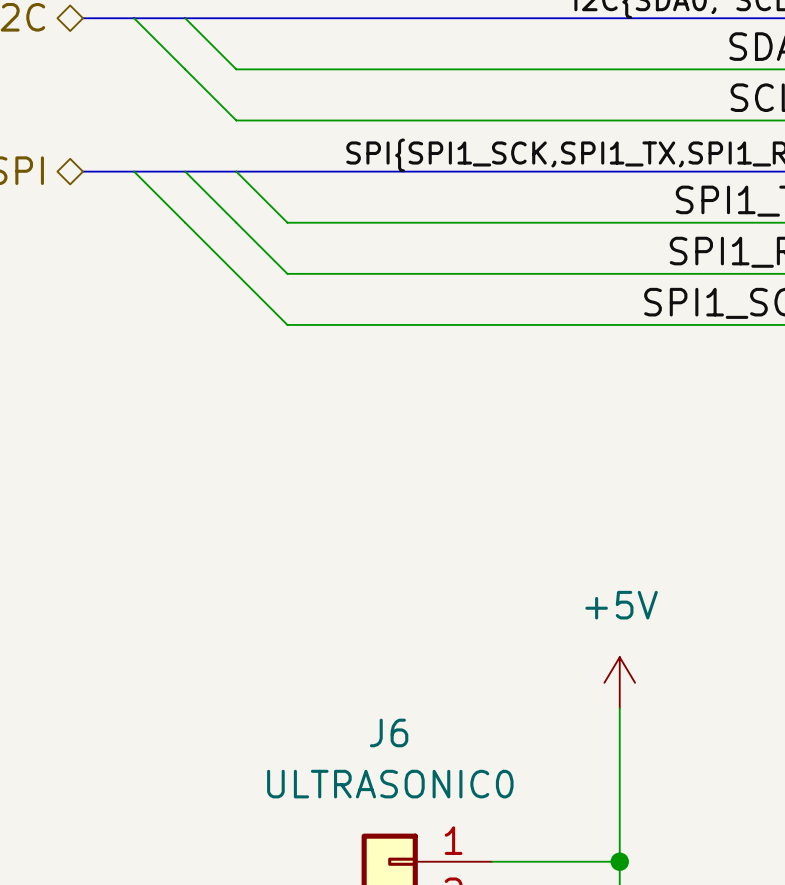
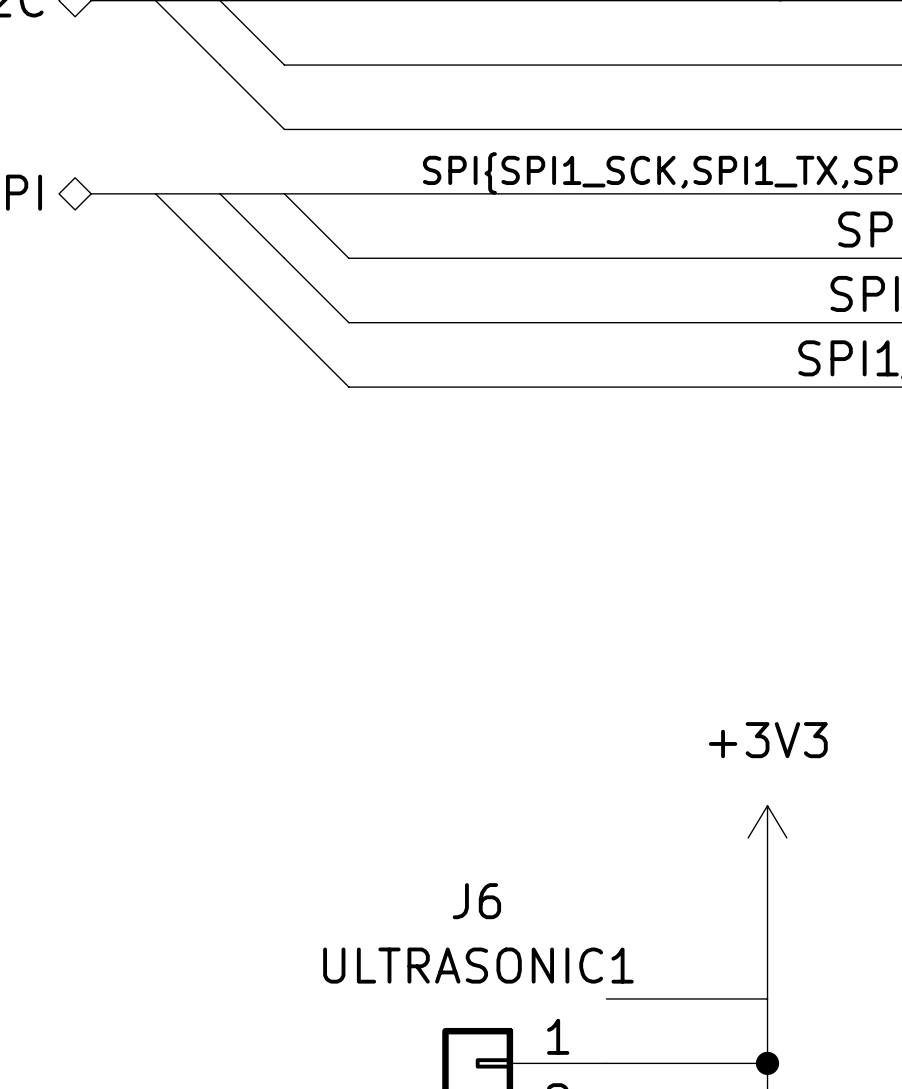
power symbol: +5V (619, 682) -> +3V3 (767, 837)
J6 value: ULTRASONIC0 (390, 784) -> ULTRASONIC1 (478, 965)
wire: none -> (606, 998) (767, 998)

